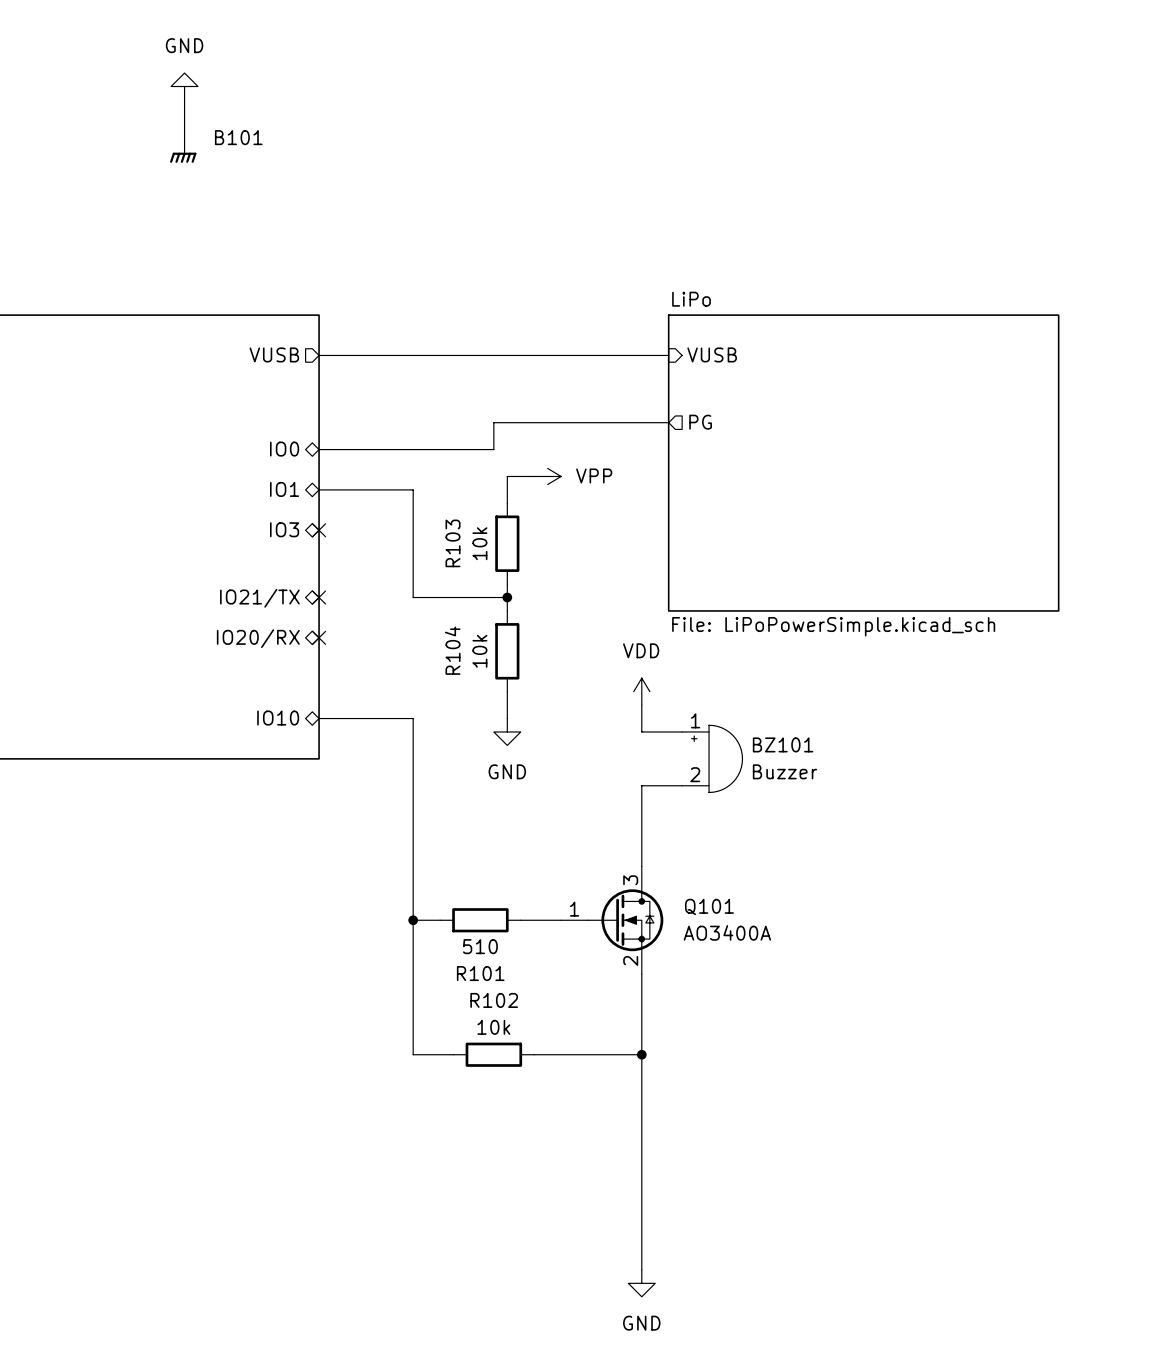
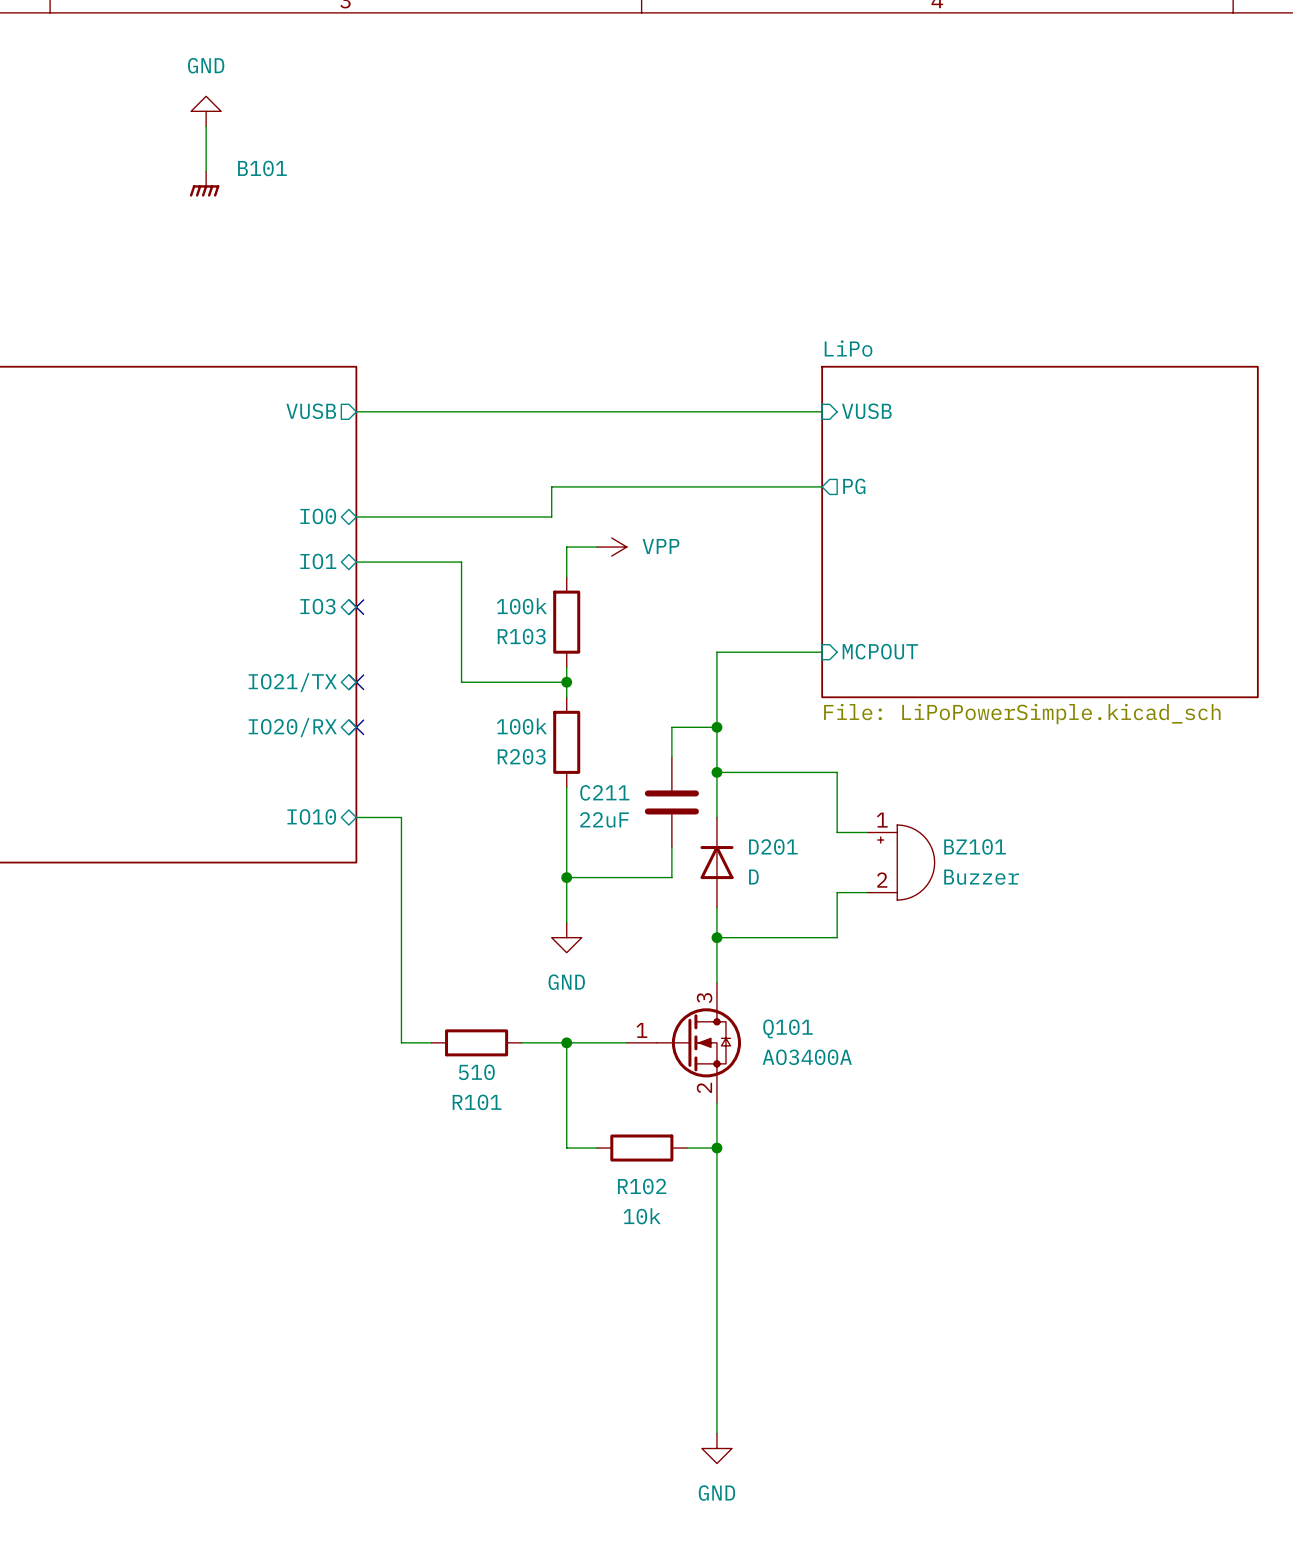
sheet pin position: VUSB (712, 354) -> VUSB (866, 411)
wire: none -> (747, 411) (822, 411)
wire: none -> (747, 486) (822, 486)
sheet pin position: PG (700, 422) -> PG (854, 486)
sheet LiPo position: (863, 463) -> (1040, 532)
R103 name rotation: 0° (453, 543) -> 90° clockwise (521, 636)
R103 value: 10k (479, 543) -> 100k (521, 606)
wire: none -> (822, 652) (716, 652) (716, 802)
sheet pin: none -> MCPOUT (880, 651)
wire: none -> (716, 727) (671, 727) (671, 757)
junction: none -> (716, 727)
R104 name: R104 (452, 650) -> R203 (521, 756)
R104 value: 10k (479, 651) -> 100k (521, 726)
wire: none -> (716, 772) (837, 772) (837, 832) (867, 832)
junction: none -> (716, 772)
power symbol: VDD (641, 691) -> none
C211: none -> 22uF (671, 802)
wire: (359, 718) (413, 718) (413, 1054) (453, 1054) -> (401, 817) (401, 1042) (431, 1042)
wire: none -> (566, 817) (566, 922)
wire: (641, 718) (641, 731) (682, 731) -> none
power symbol position: GND (507, 731) -> GND (566, 937)
wire: none -> (671, 847) (671, 877) (566, 877)
D201: none -> D (716, 862)
BZ101 position: (712, 758) -> (900, 862)
junction: none -> (566, 877)
wire: (682, 785) (641, 785) (641, 799) -> none
wire: none -> (867, 892) (837, 892) (837, 937) (716, 937)
junction: none -> (716, 937)
wire: (413, 920) (440, 920) -> (686, 1148) (716, 1148)
junction: (413, 920) -> none
wire: none -> (521, 1042) (581, 1042)
R101 position: (480, 920) -> (476, 1042)
wire: none -> (566, 1042) (566, 1148) (596, 1148)
junction: none -> (566, 1042)
R102 name position: R102 (494, 1000) -> R102 (642, 1186)
R102 value position: 10k (493, 1027) -> 10k (642, 1216)
R102 position: (493, 1054) -> (641, 1148)
wire: (534, 1054) (641, 1054) -> none
junction position: (641, 1054) -> (716, 1148)

